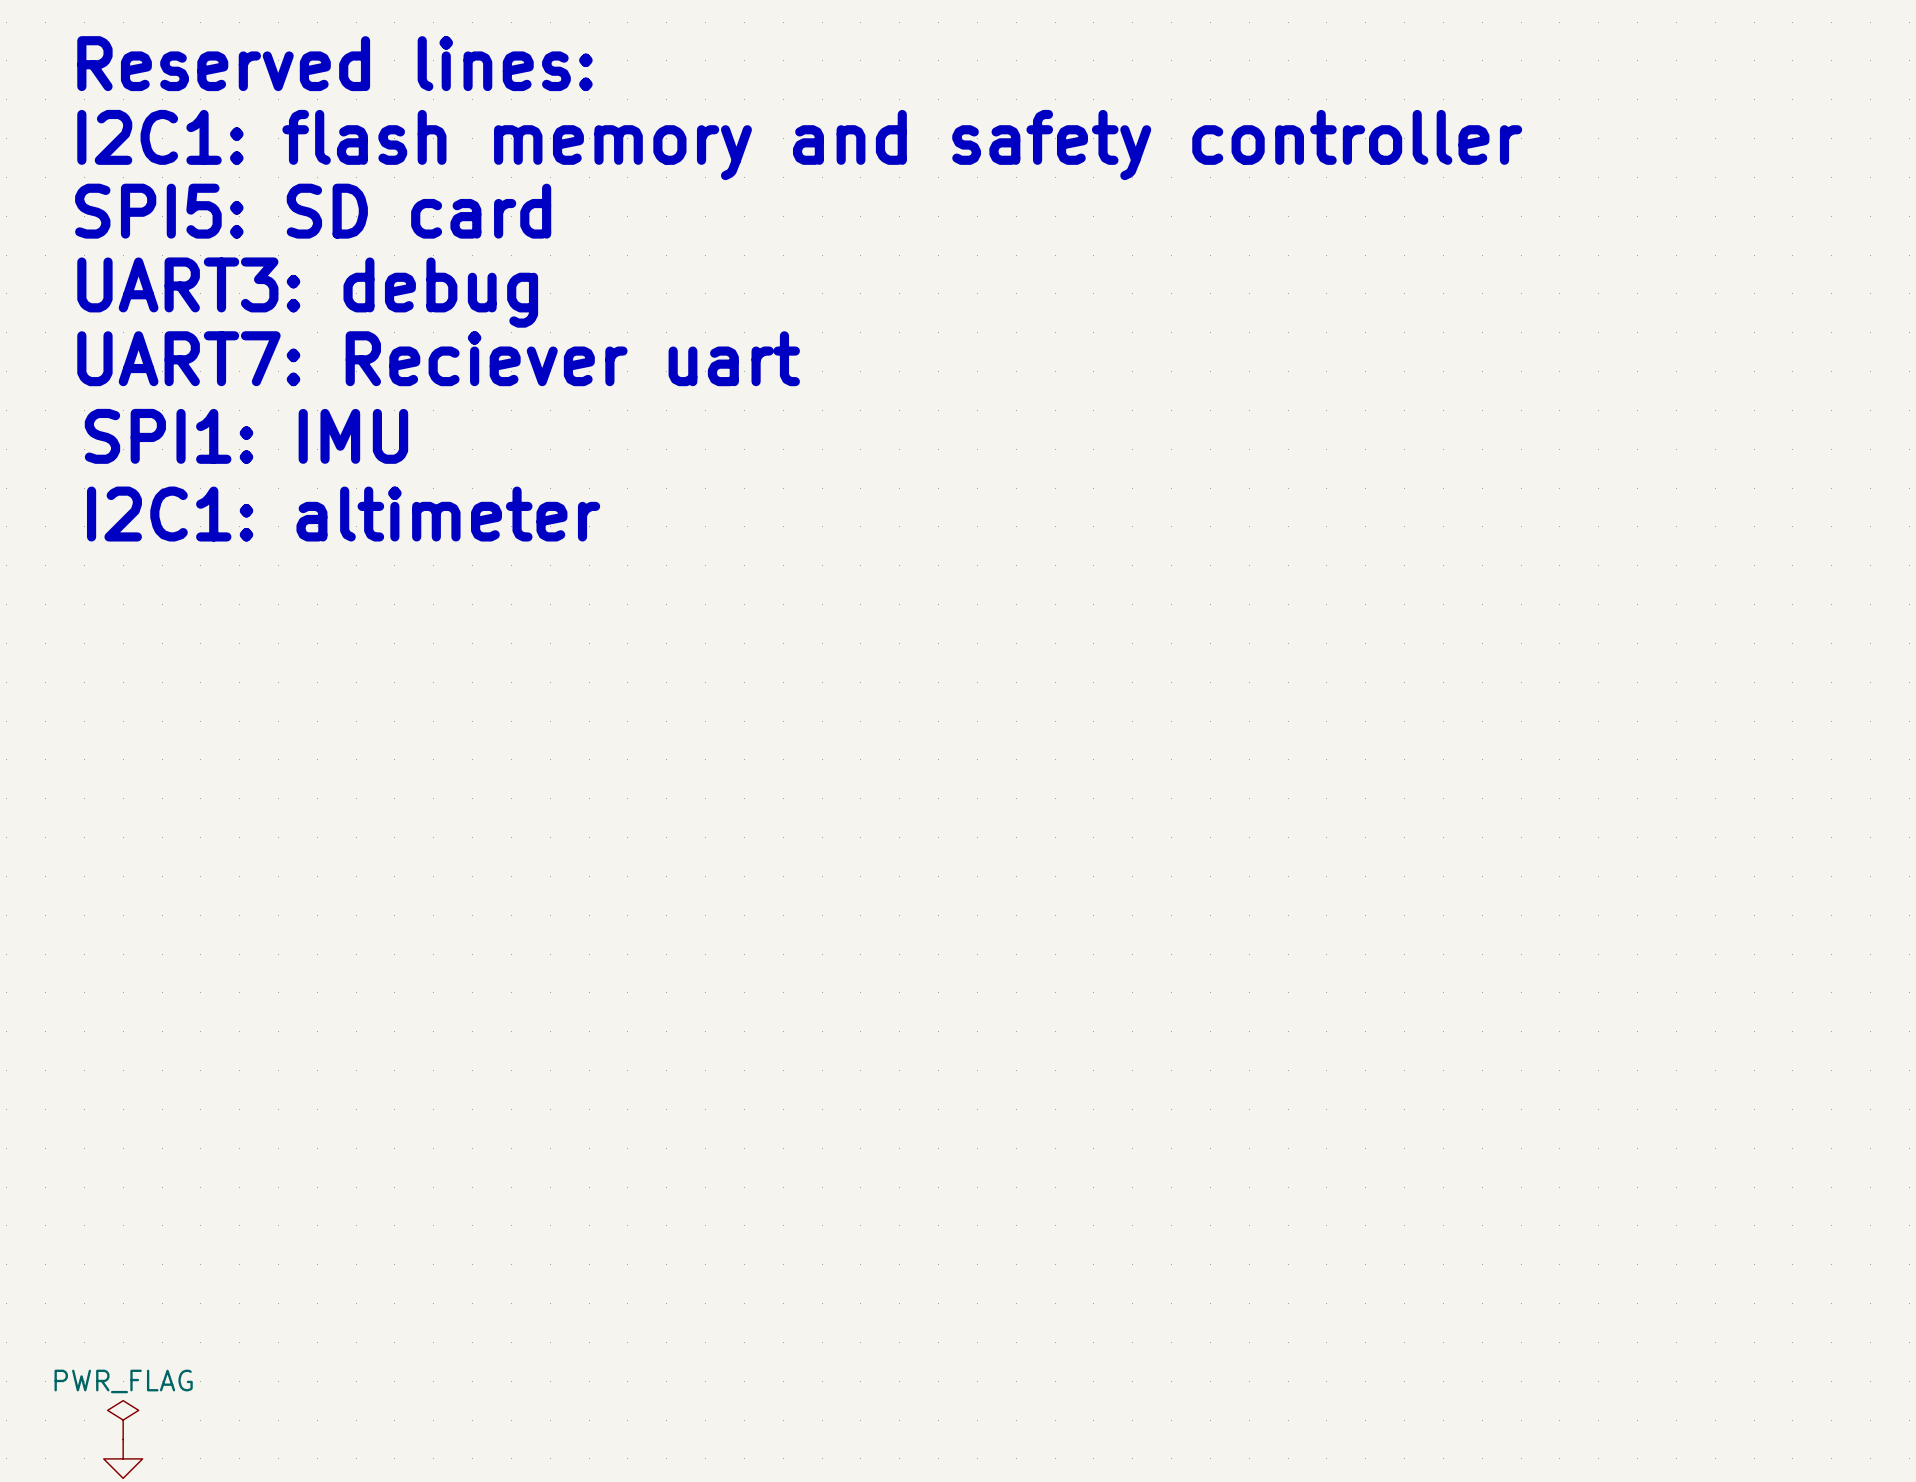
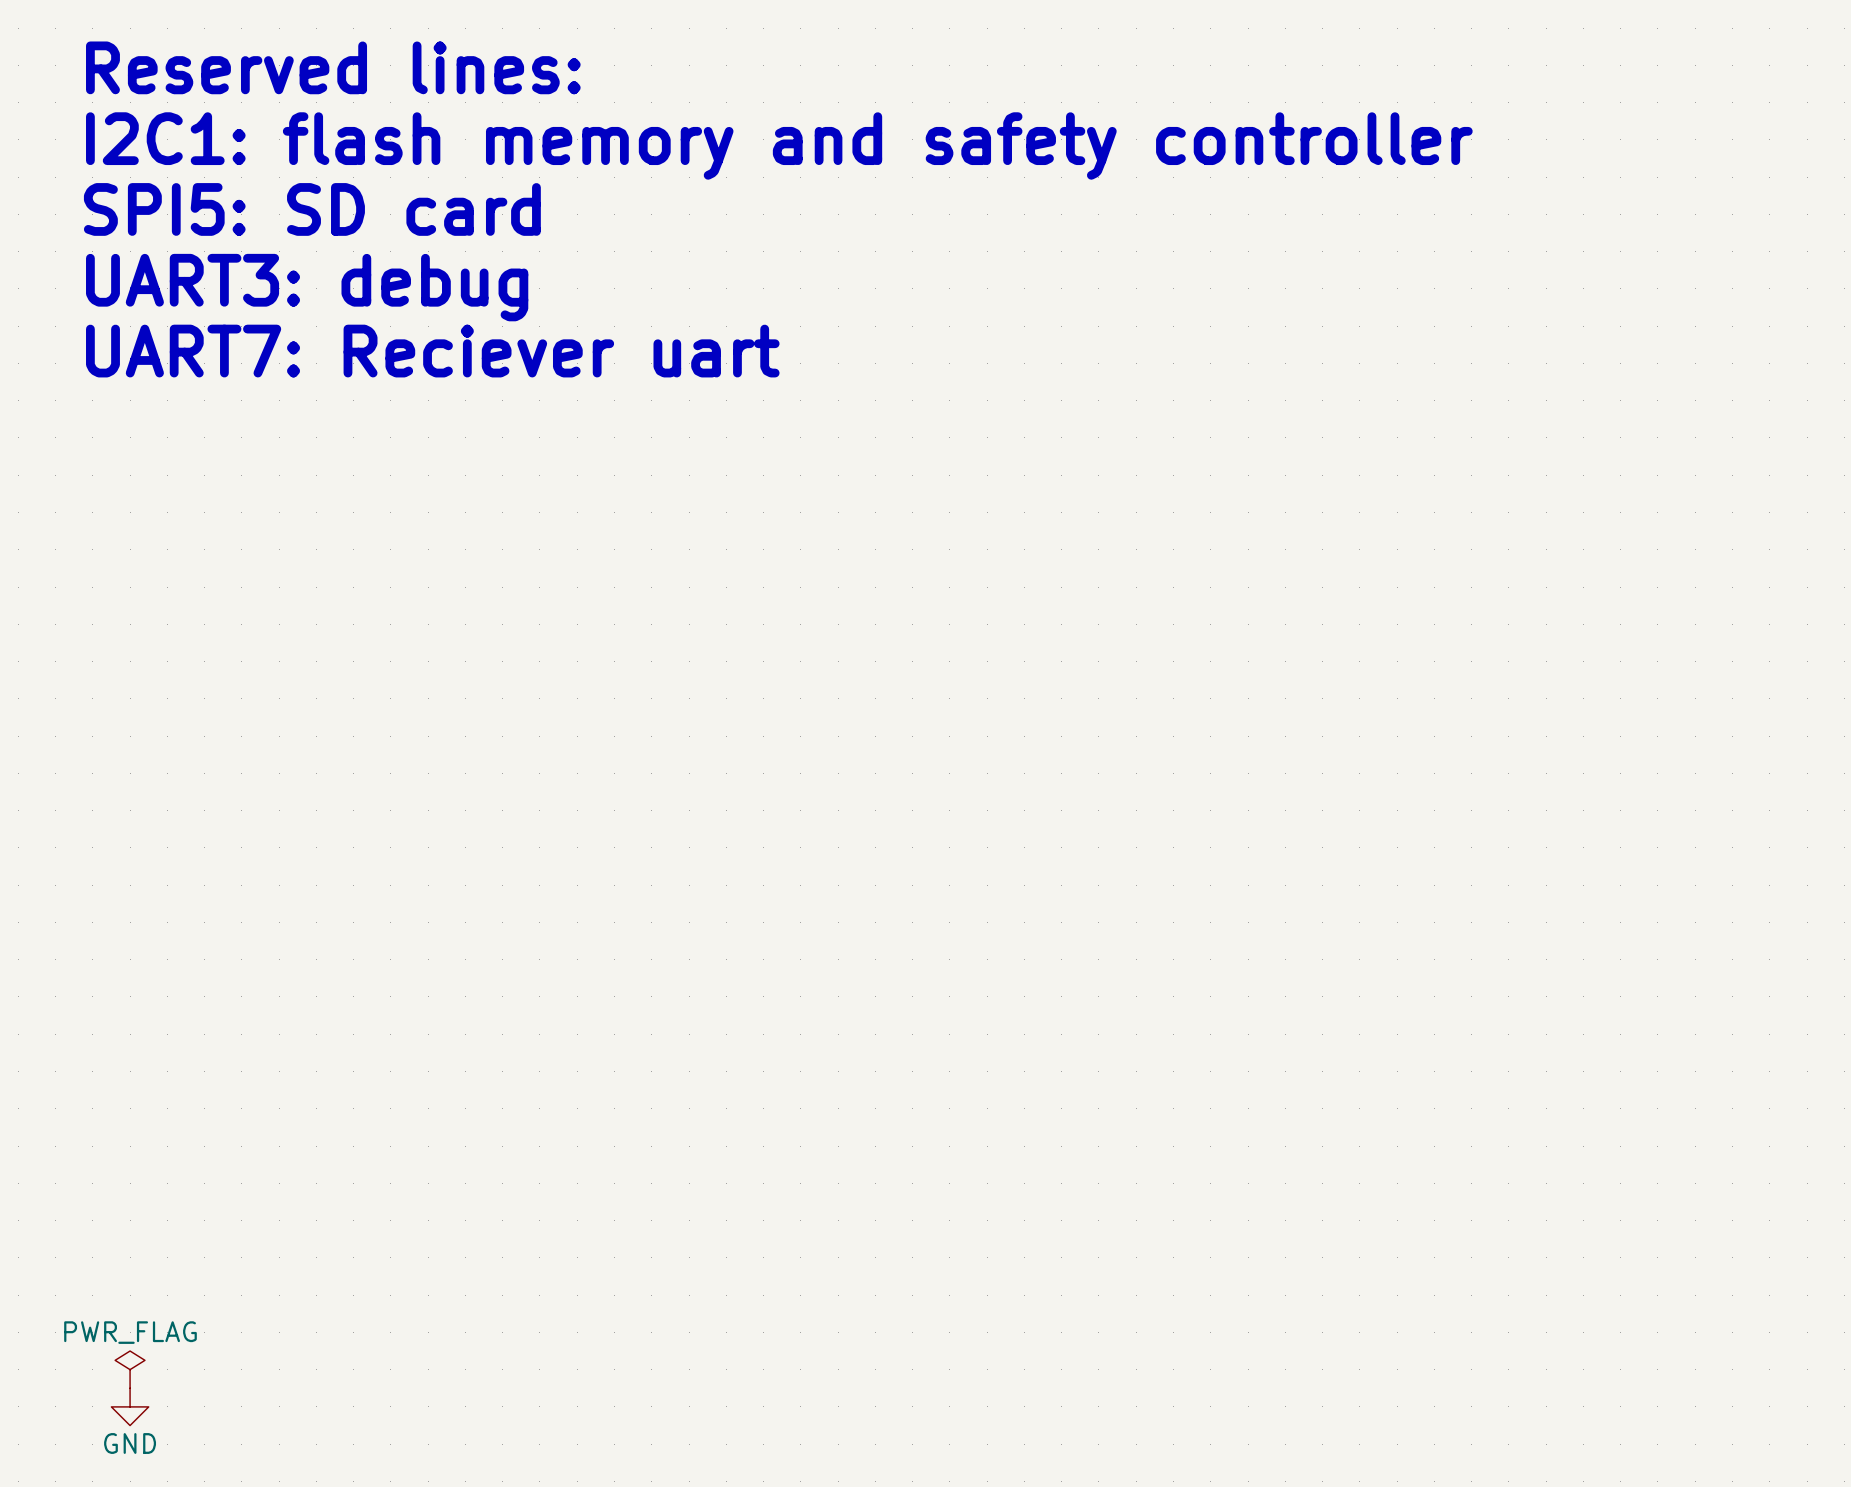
text: SPI1: IMU (246, 436) -> none
text: I2C1: altimeter (343, 514) -> none

